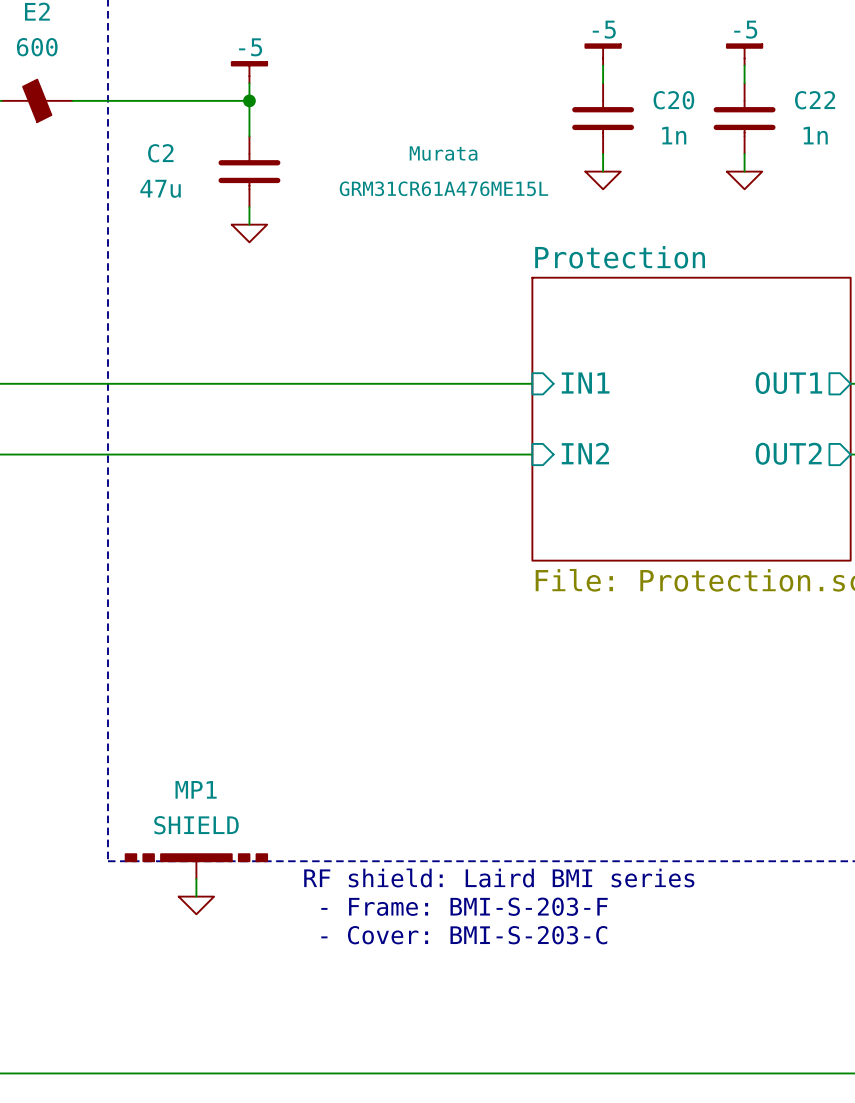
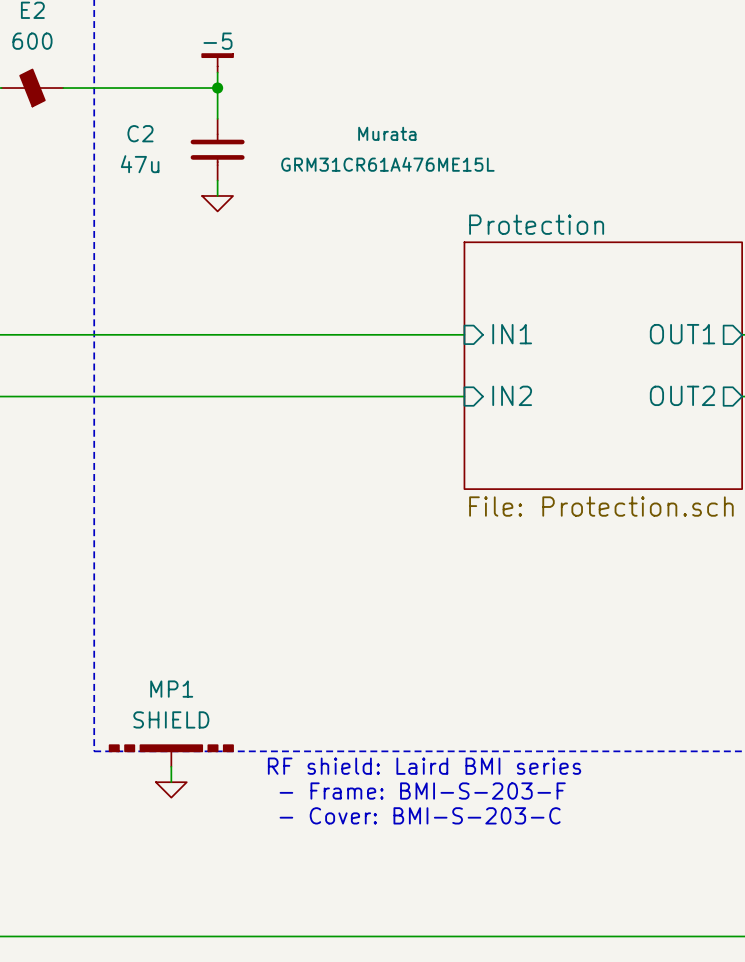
power symbol: -5 (603, 54) -> none
power symbol: -5 (744, 54) -> none
wire: (603, 65) (603, 83) -> none
wire: (744, 65) (744, 83) -> none
C20: 1n (603, 118) -> none
C22: 1n (744, 118) -> none
wire: (603, 153) (603, 171) -> none
wire: (744, 153) (744, 171) -> none
power symbol: (603, 180) -> none
power symbol: (744, 180) -> none

